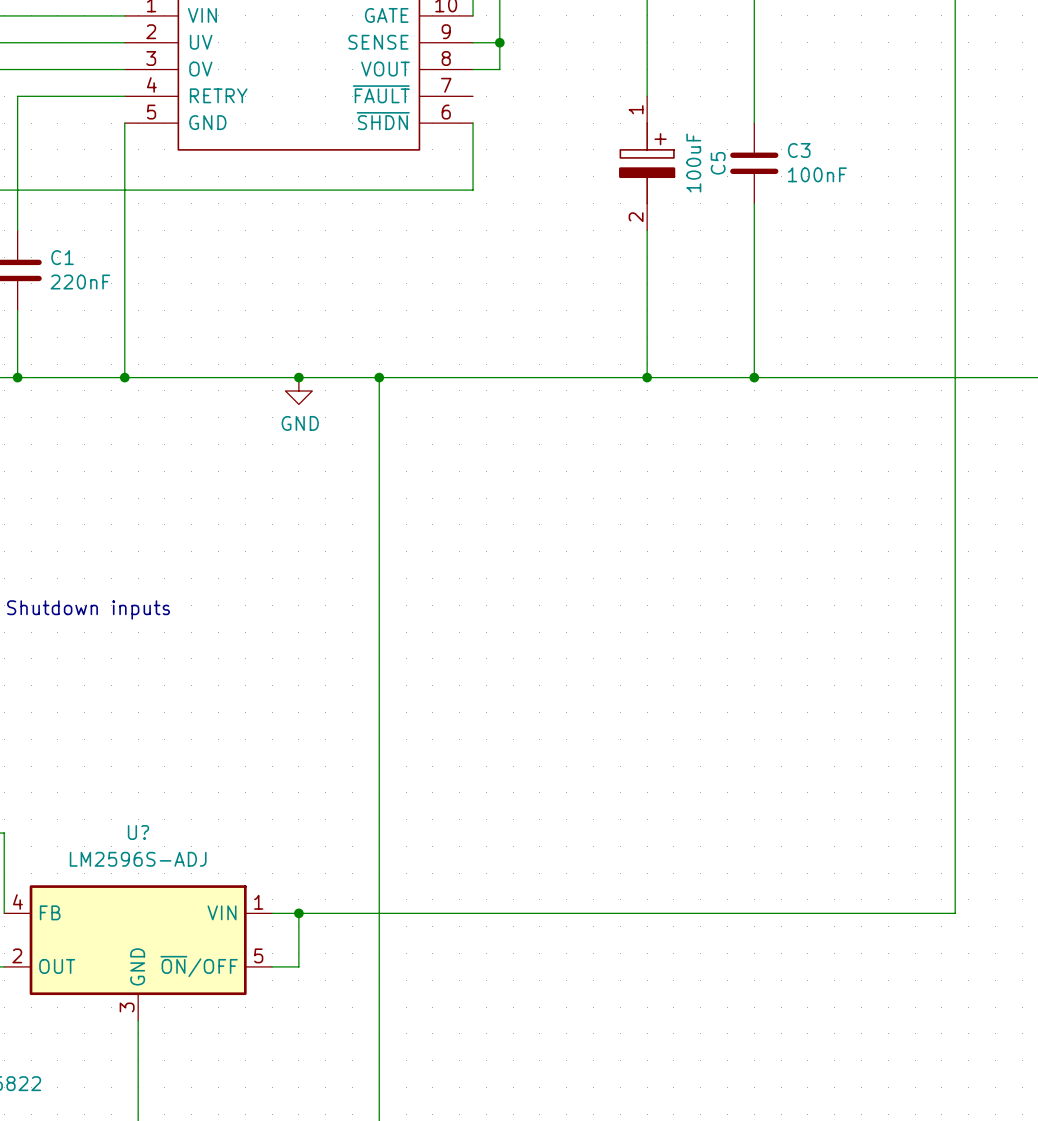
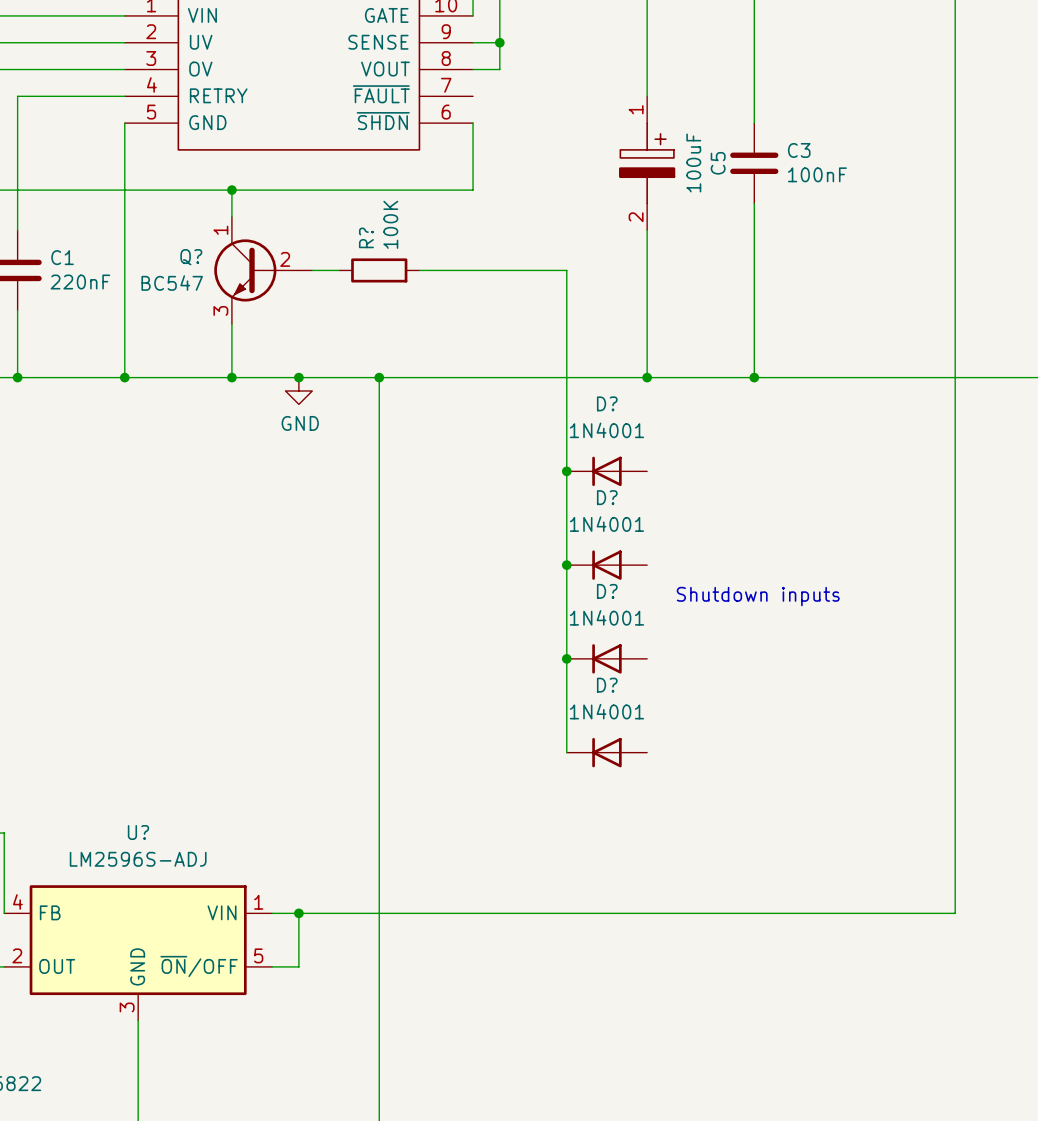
wire: none -> (231, 190) (231, 216)
junction: none -> (231, 190)
Q?: none -> BC547 (263, 270)
wire: none -> (312, 270) (339, 270)
R?: none -> 100K (379, 270)
wire: none -> (419, 270) (566, 270) (566, 752)
wire: none -> (231, 324) (231, 377)
junction: none -> (231, 377)
junction: none -> (566, 471)
D?: none -> 1N4001 (606, 471)
junction: none -> (566, 565)
D?: none -> 1N4001 (606, 565)
text: none -> Shutdown inputs (758, 596)
text: Shutdown inputs (88, 609) -> none
junction: none -> (566, 658)
D?: none -> 1N4001 (606, 658)
D?: none -> 1N4001 (606, 752)

